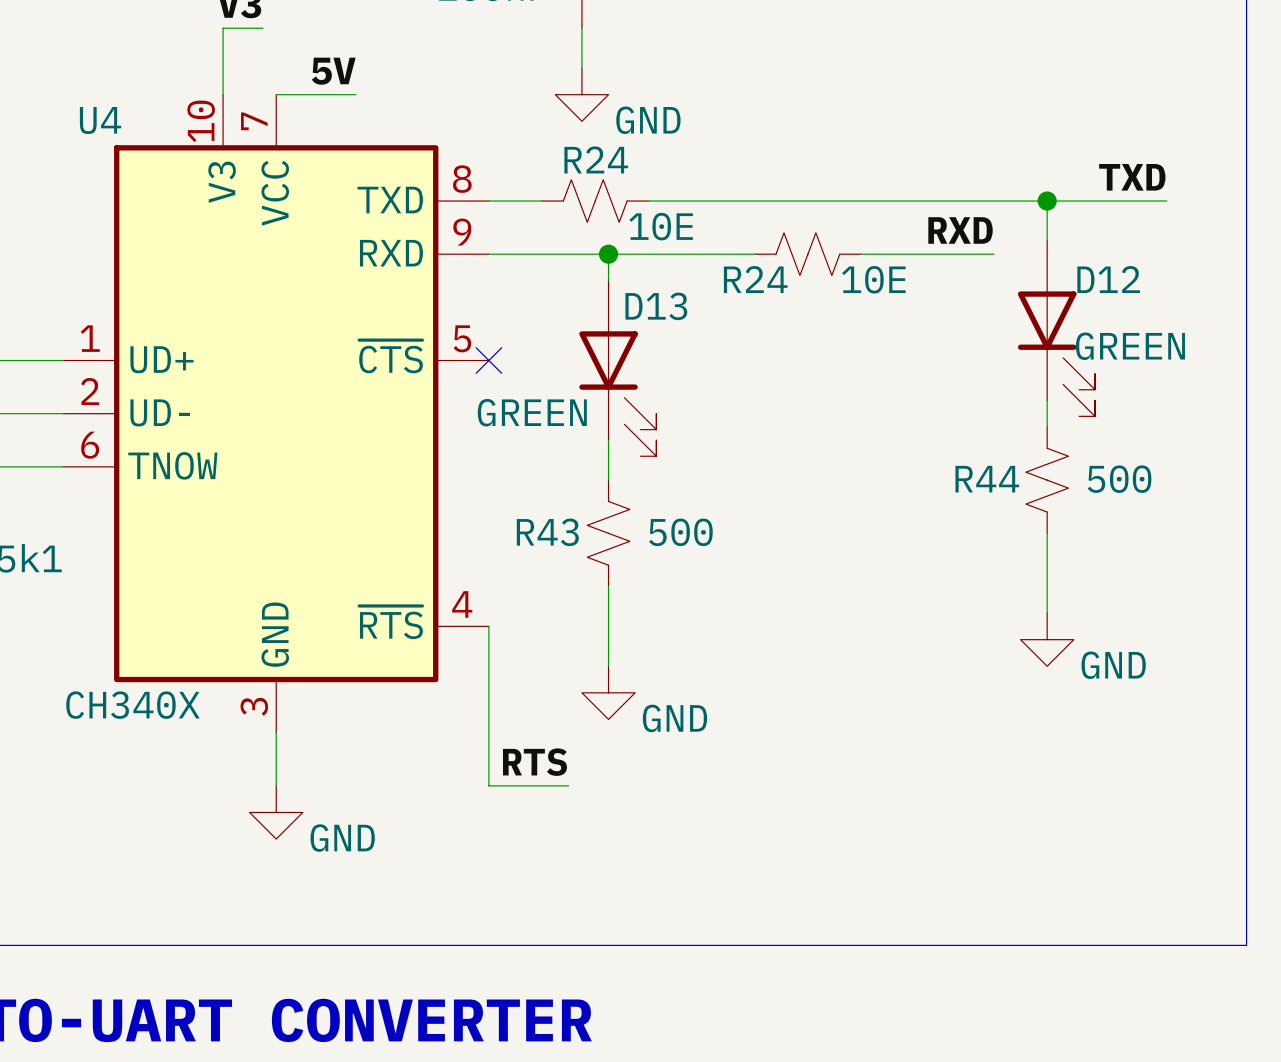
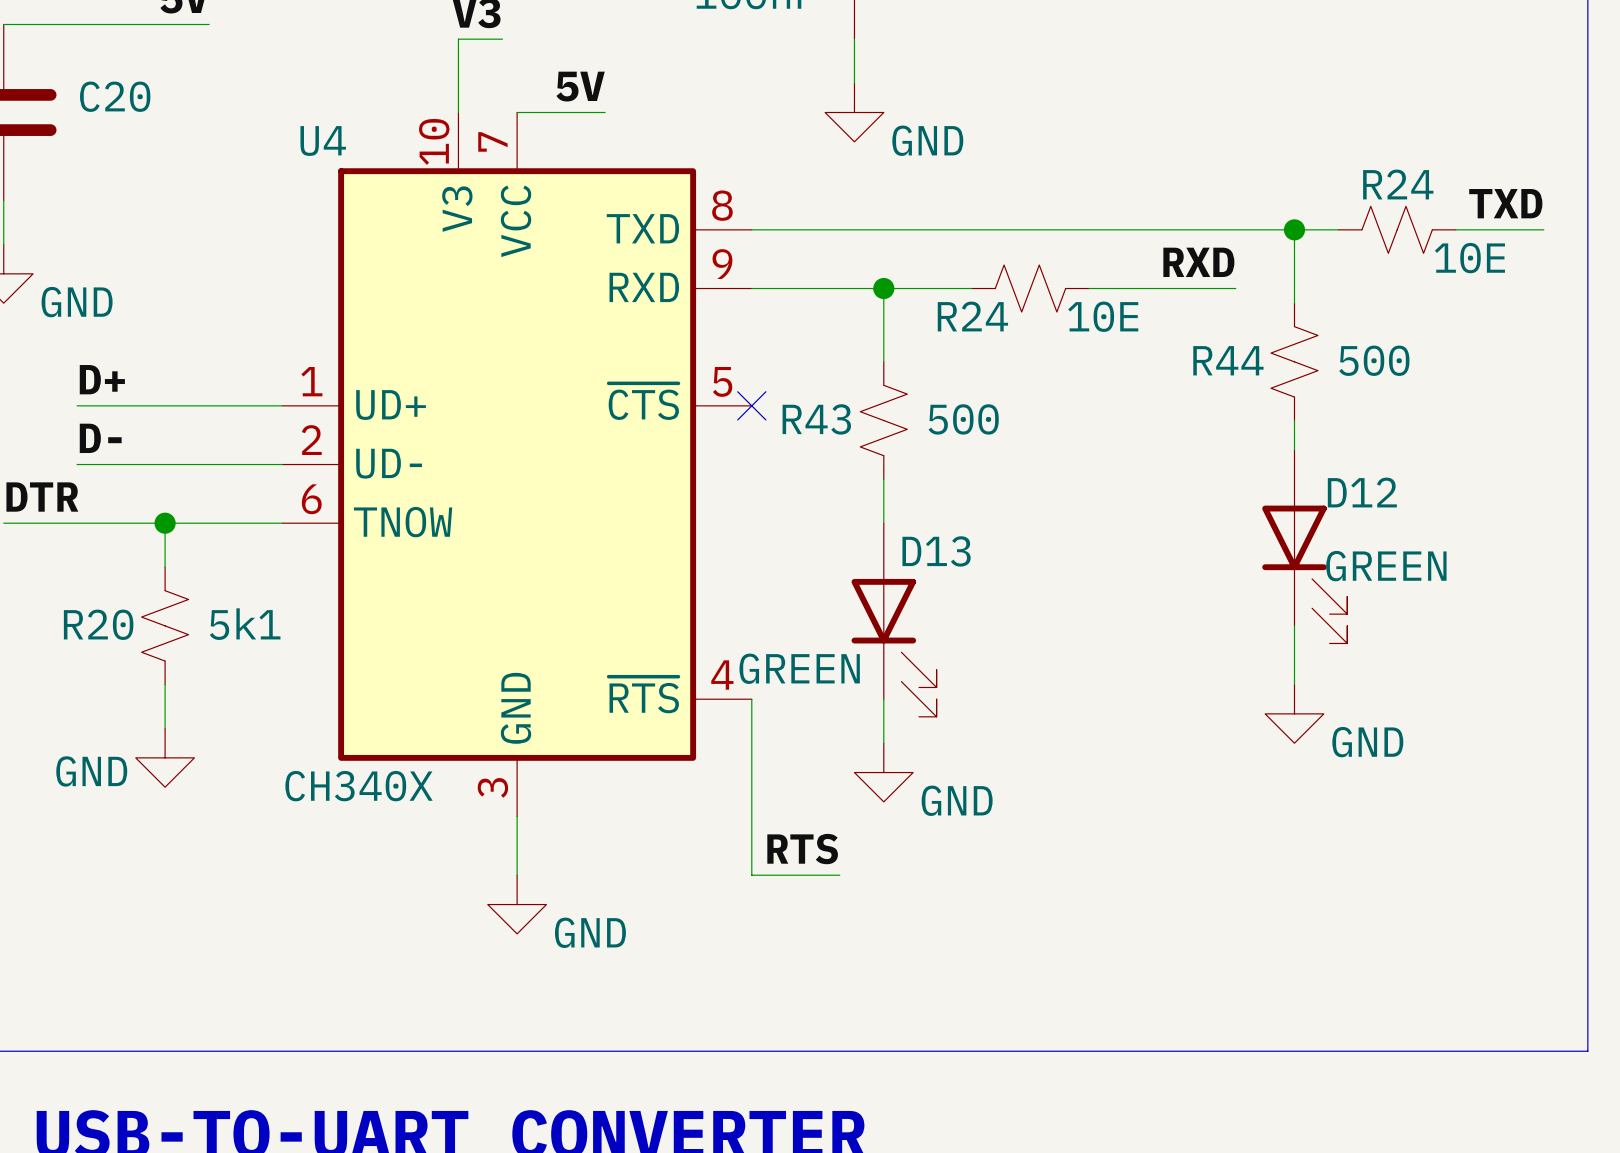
label position: TXD (1132, 177) -> TXD (1505, 203)
R24: 10E (595, 201) -> none
wire: none -> (1294, 229) (1294, 303)
wire: (1020, 201) (1126, 201) -> (810, 229) (927, 229)
wire: (1047, 201) (1047, 240) -> none
junction position: (1047, 201) -> (1294, 229)
R24: none -> 10E (1397, 229)
wire: none -> (1499, 229) (1543, 229)
label position: RXD (960, 230) -> RXD (1198, 262)
wire: (688, 254) (754, 254) -> (1089, 288) (1162, 288)
R24 position: (807, 254) -> (1030, 288)
wire: (927, 254) (994, 254) -> none
D12 position: (1056, 328) -> (1304, 546)
D13 position: (617, 368) -> (894, 620)
wire: (1047, 400) (1047, 426) -> (1294, 420) (1294, 449)
R44 position: (1047, 480) -> (1294, 361)
R43 position: (608, 533) -> (883, 420)
wire: (1047, 533) (1047, 613) -> none
wire: none -> (1294, 625) (1294, 684)
power symbol position: GND (1047, 639) -> GND (1294, 713)

